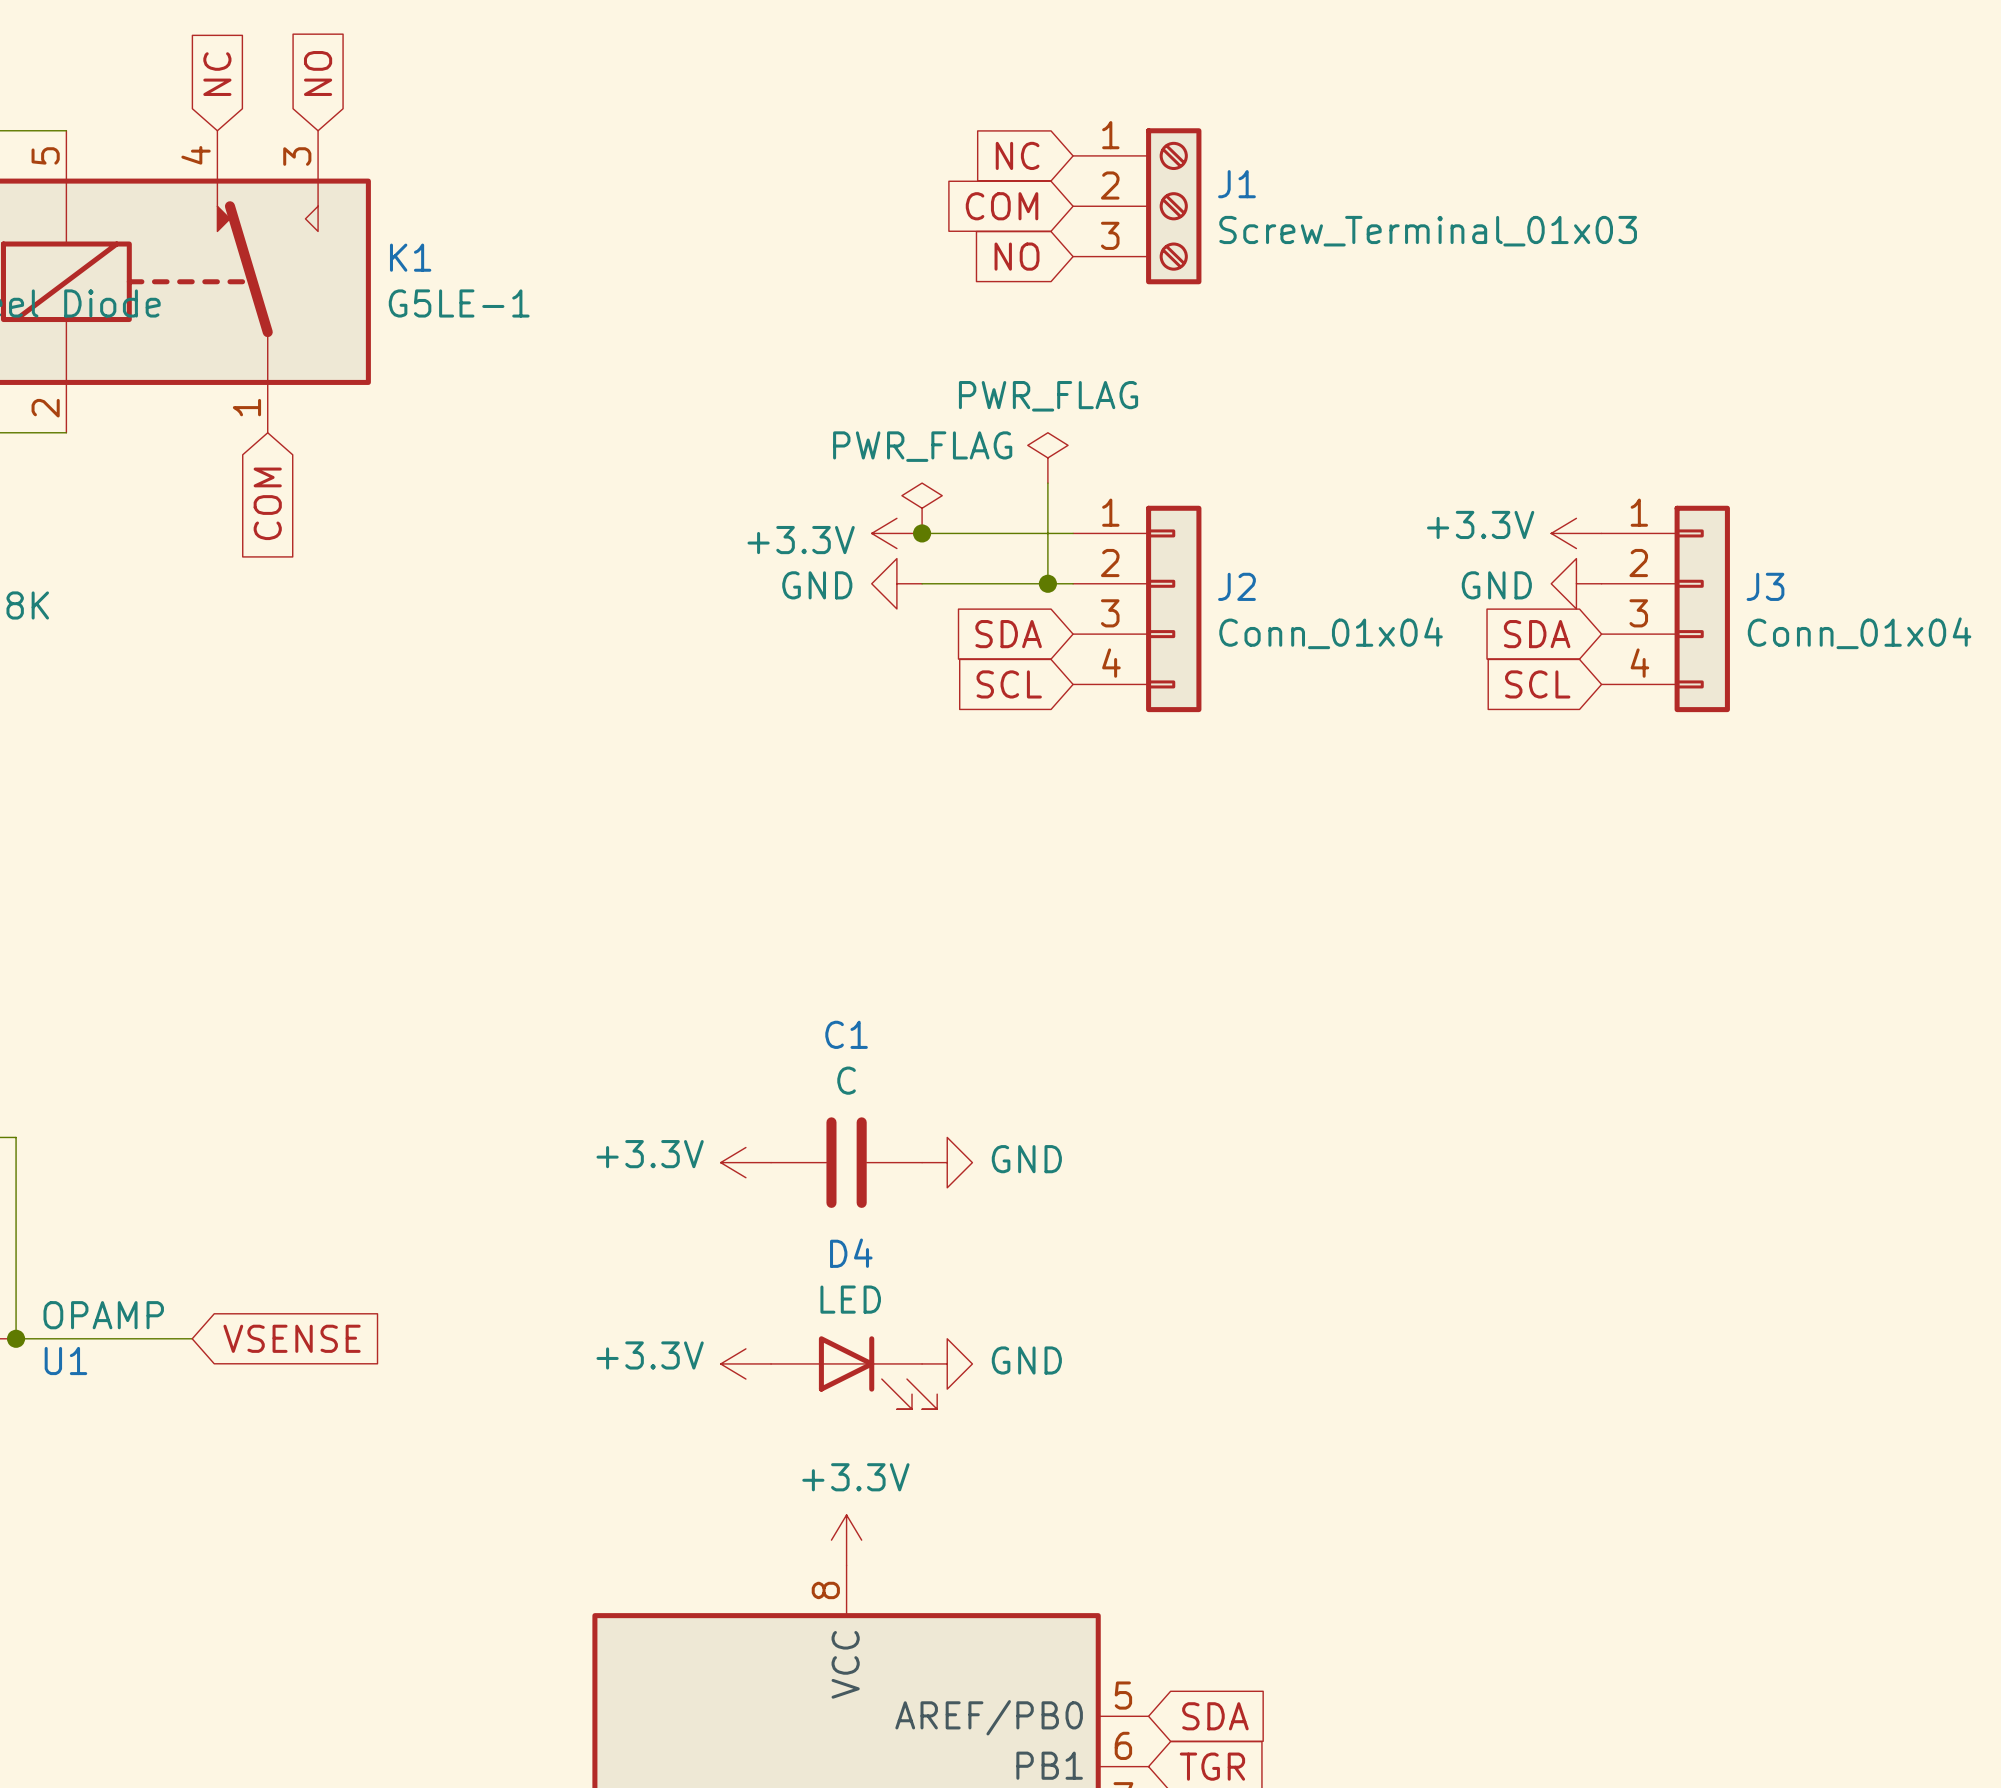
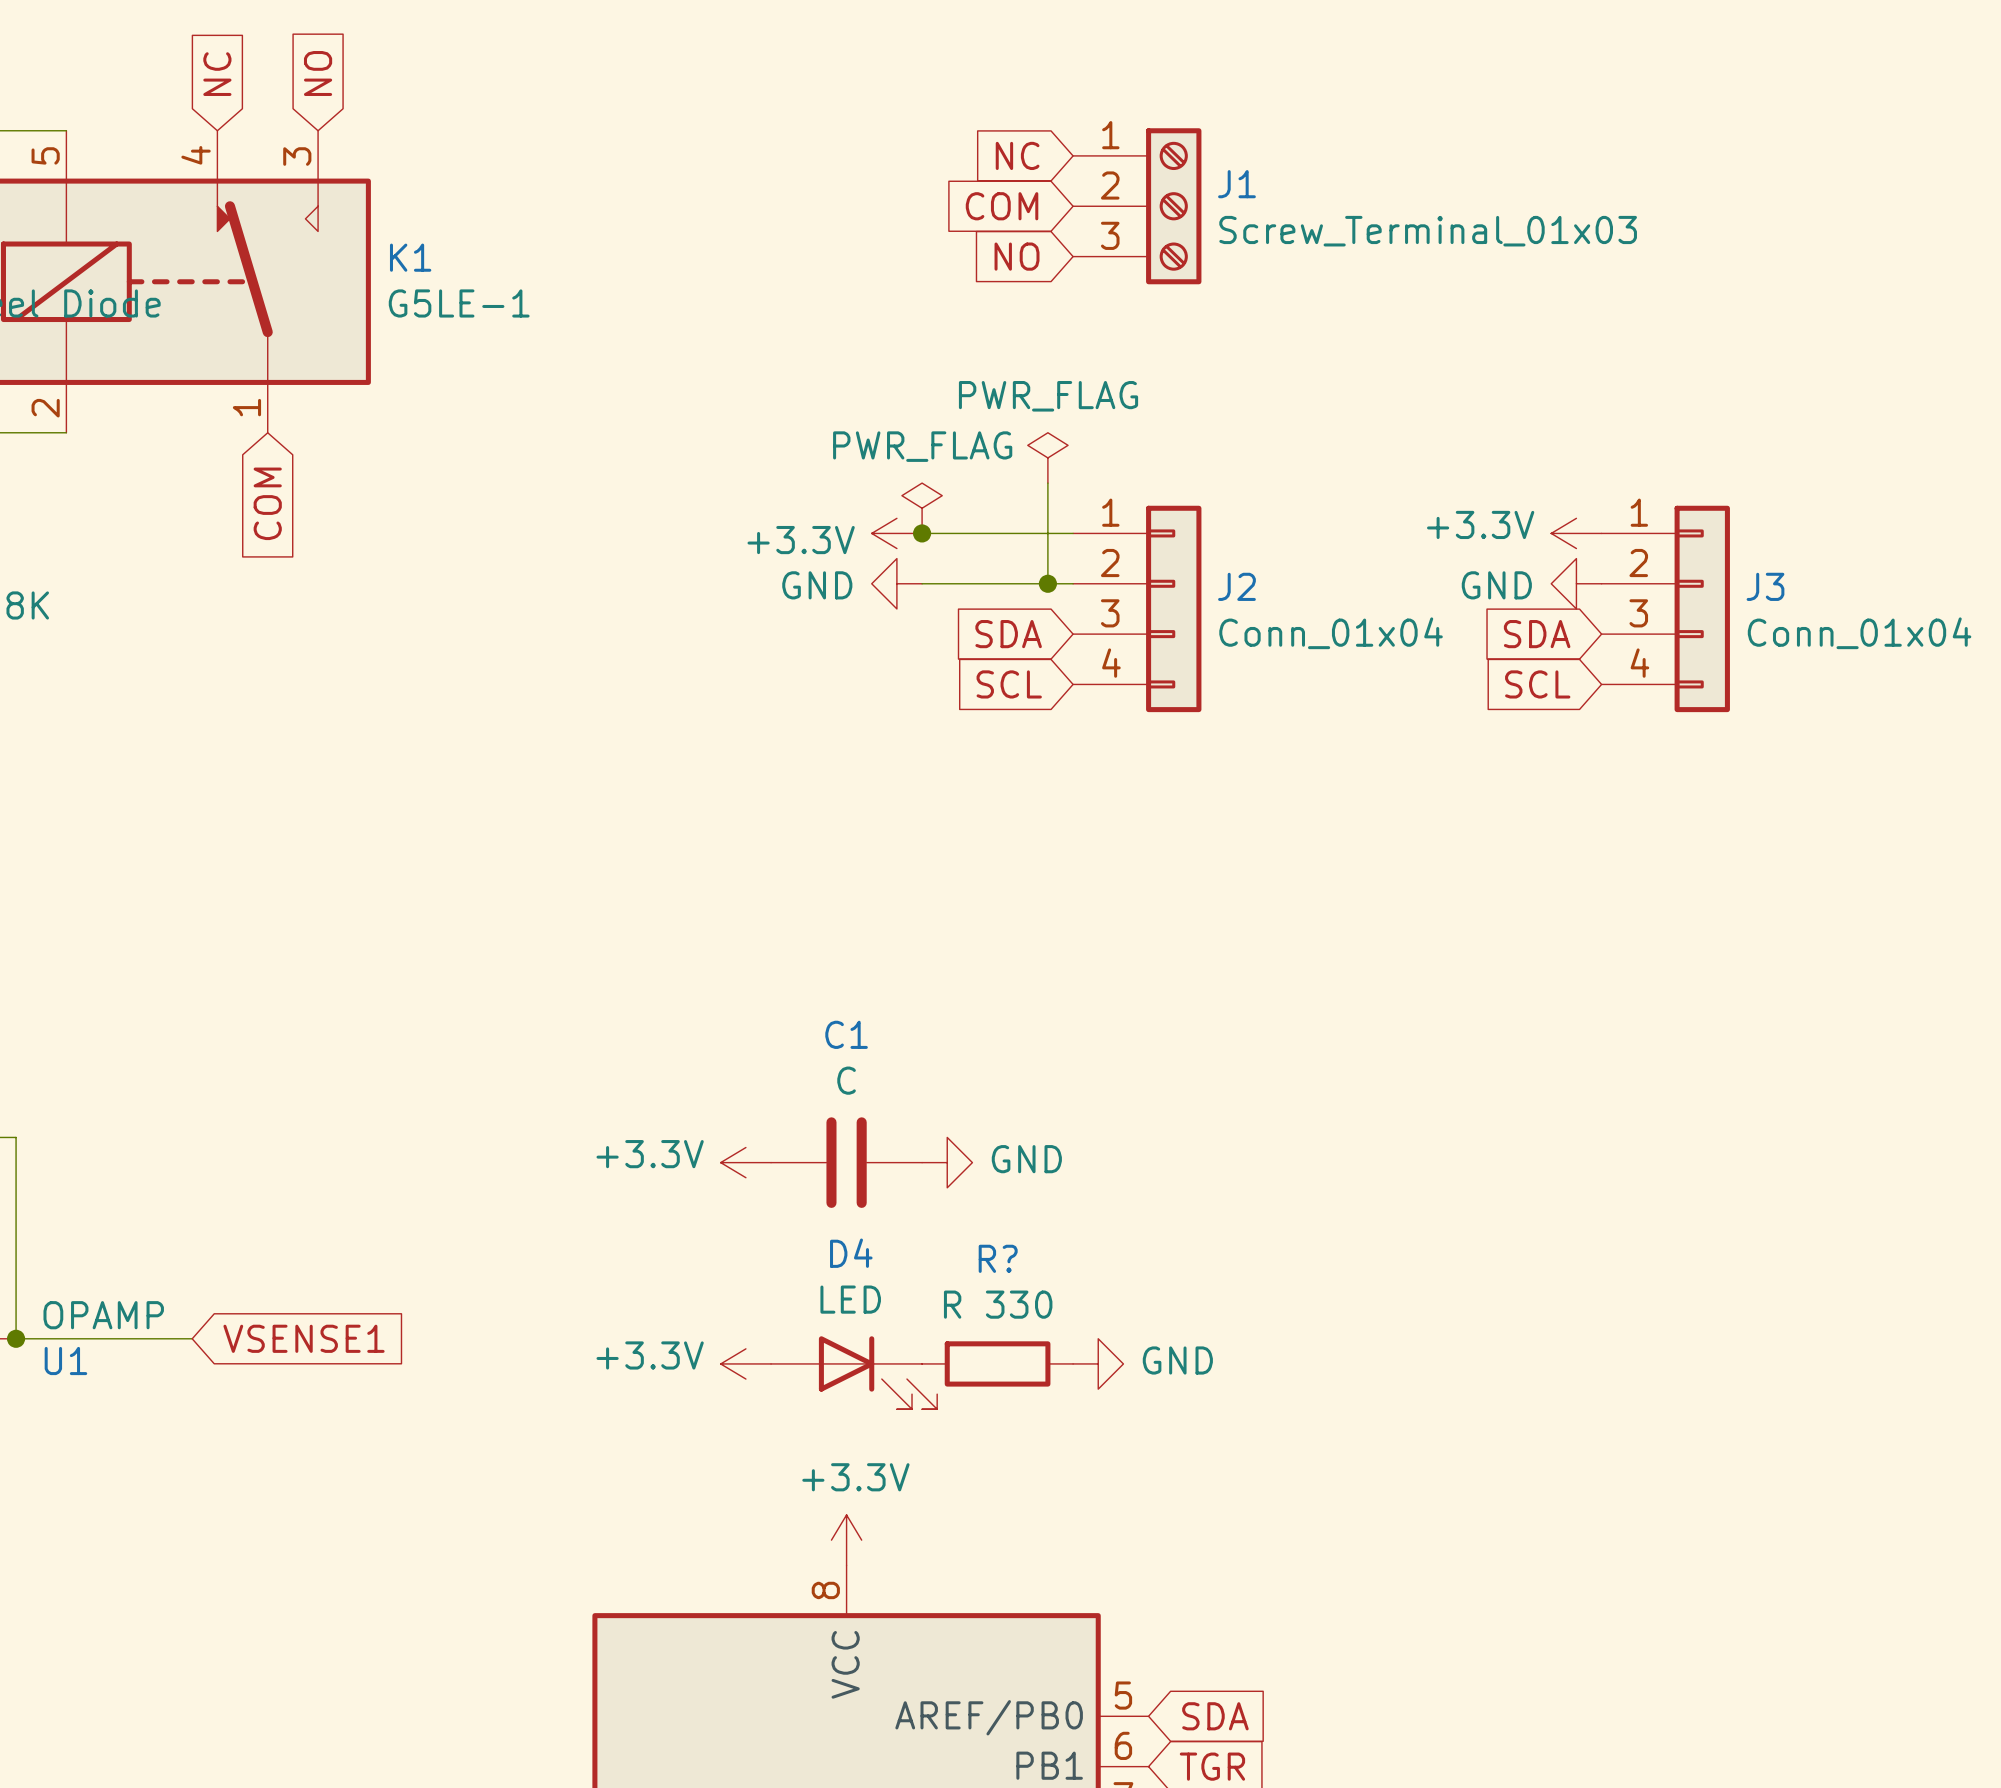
global label: VSENSE (292, 1338) -> VSENSE1 (304, 1338)
power symbol position: GND (947, 1363) -> GND (1098, 1363)
R?: none -> R 330 (997, 1363)

